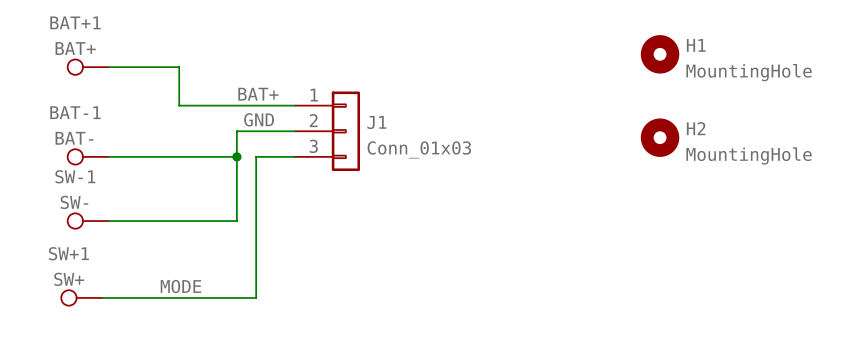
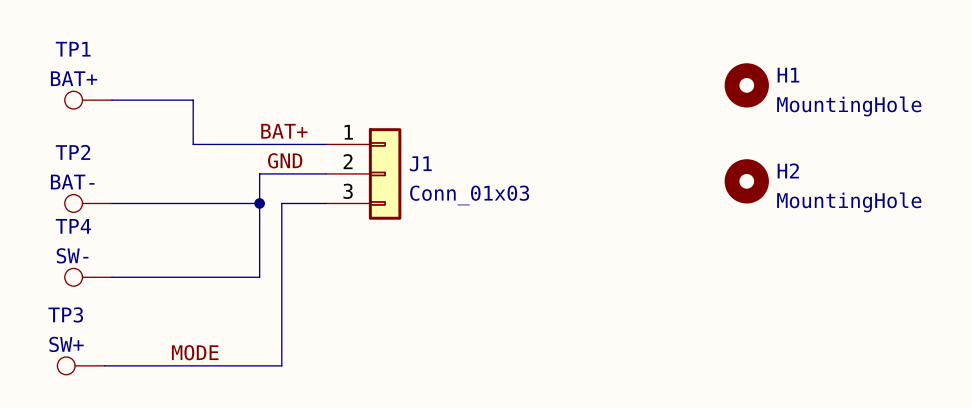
BAT+1 name: BAT+1 (75, 22) -> TP1 (73, 49)
BAT-1 name: BAT-1 (75, 112) -> TP2 (73, 152)
SW-1 name: SW-1 (75, 176) -> TP4 (73, 226)
SW+1 name: SW+1 (68, 253) -> TP3 (65, 314)

